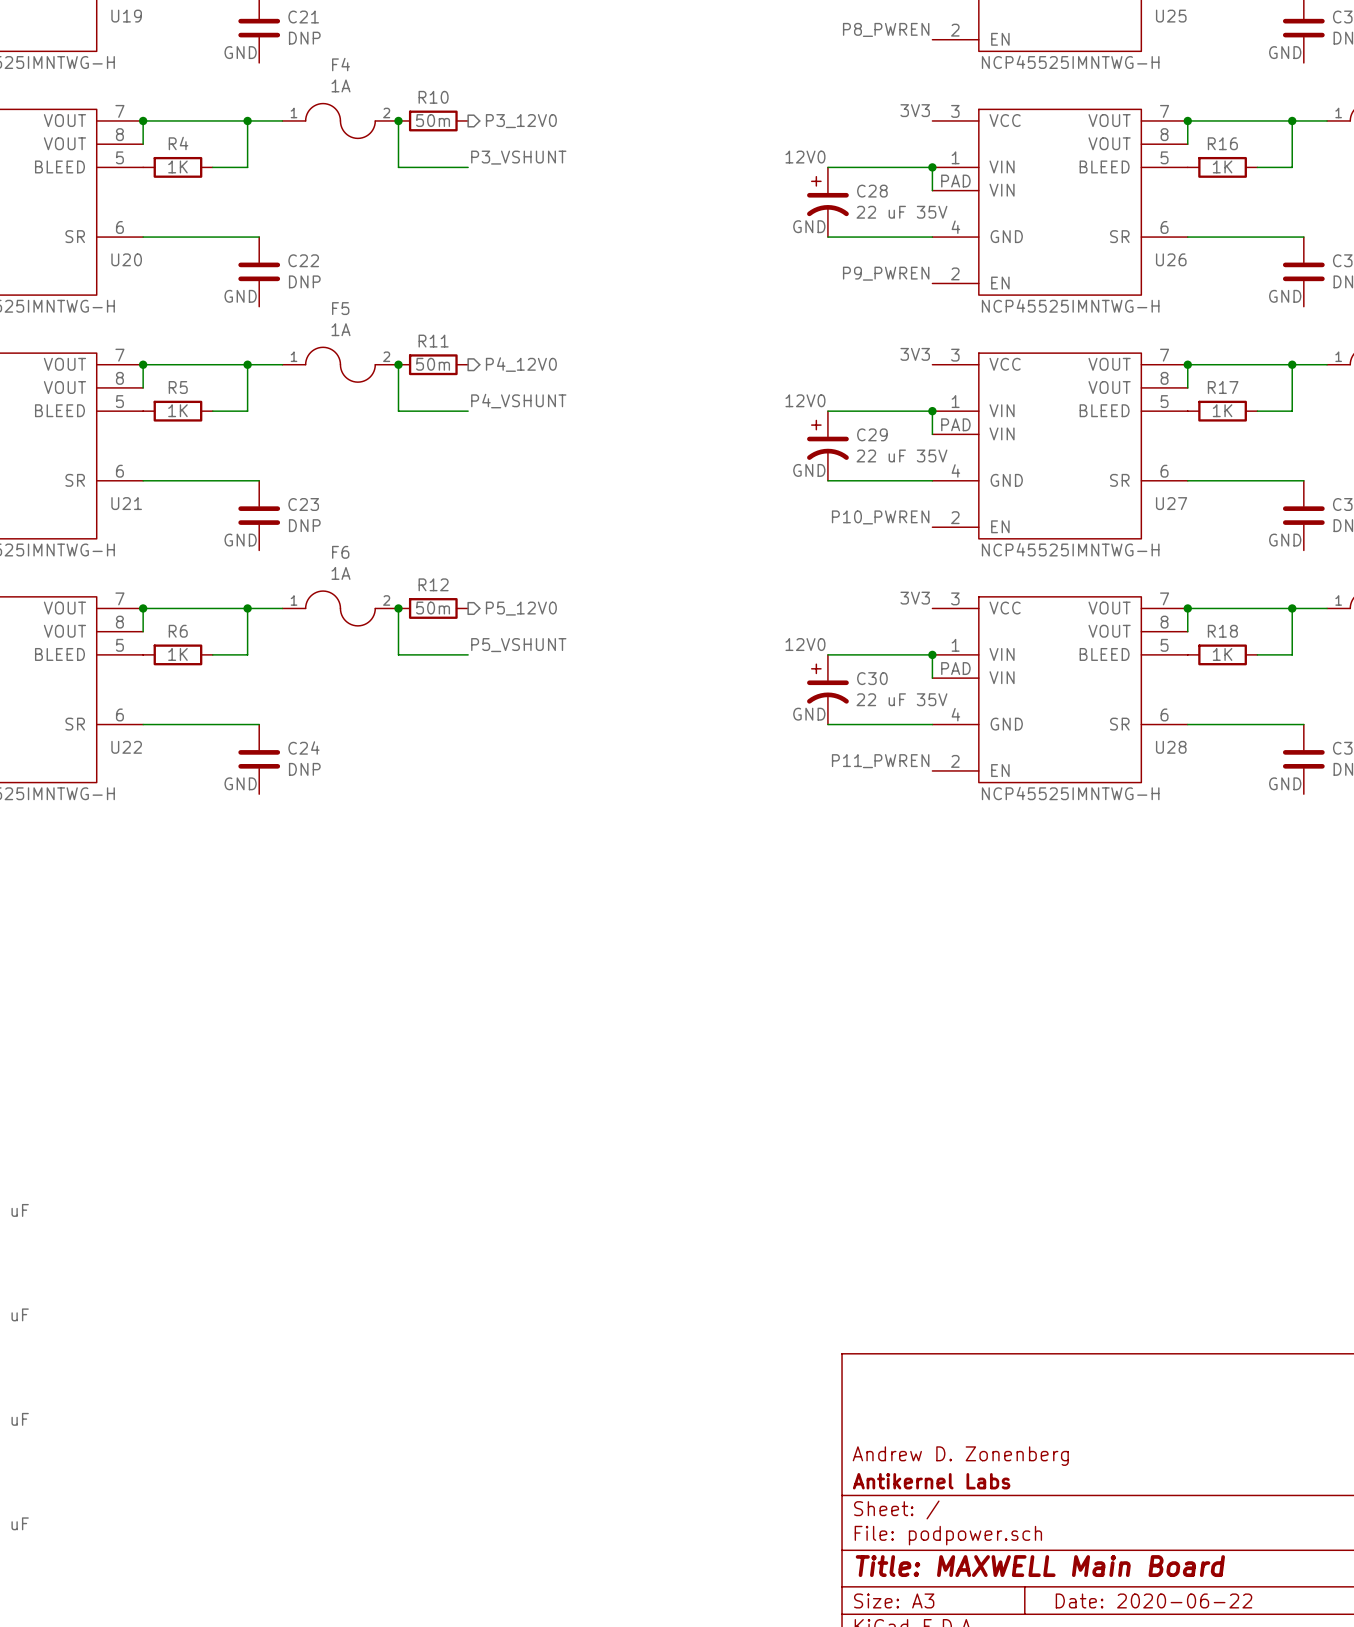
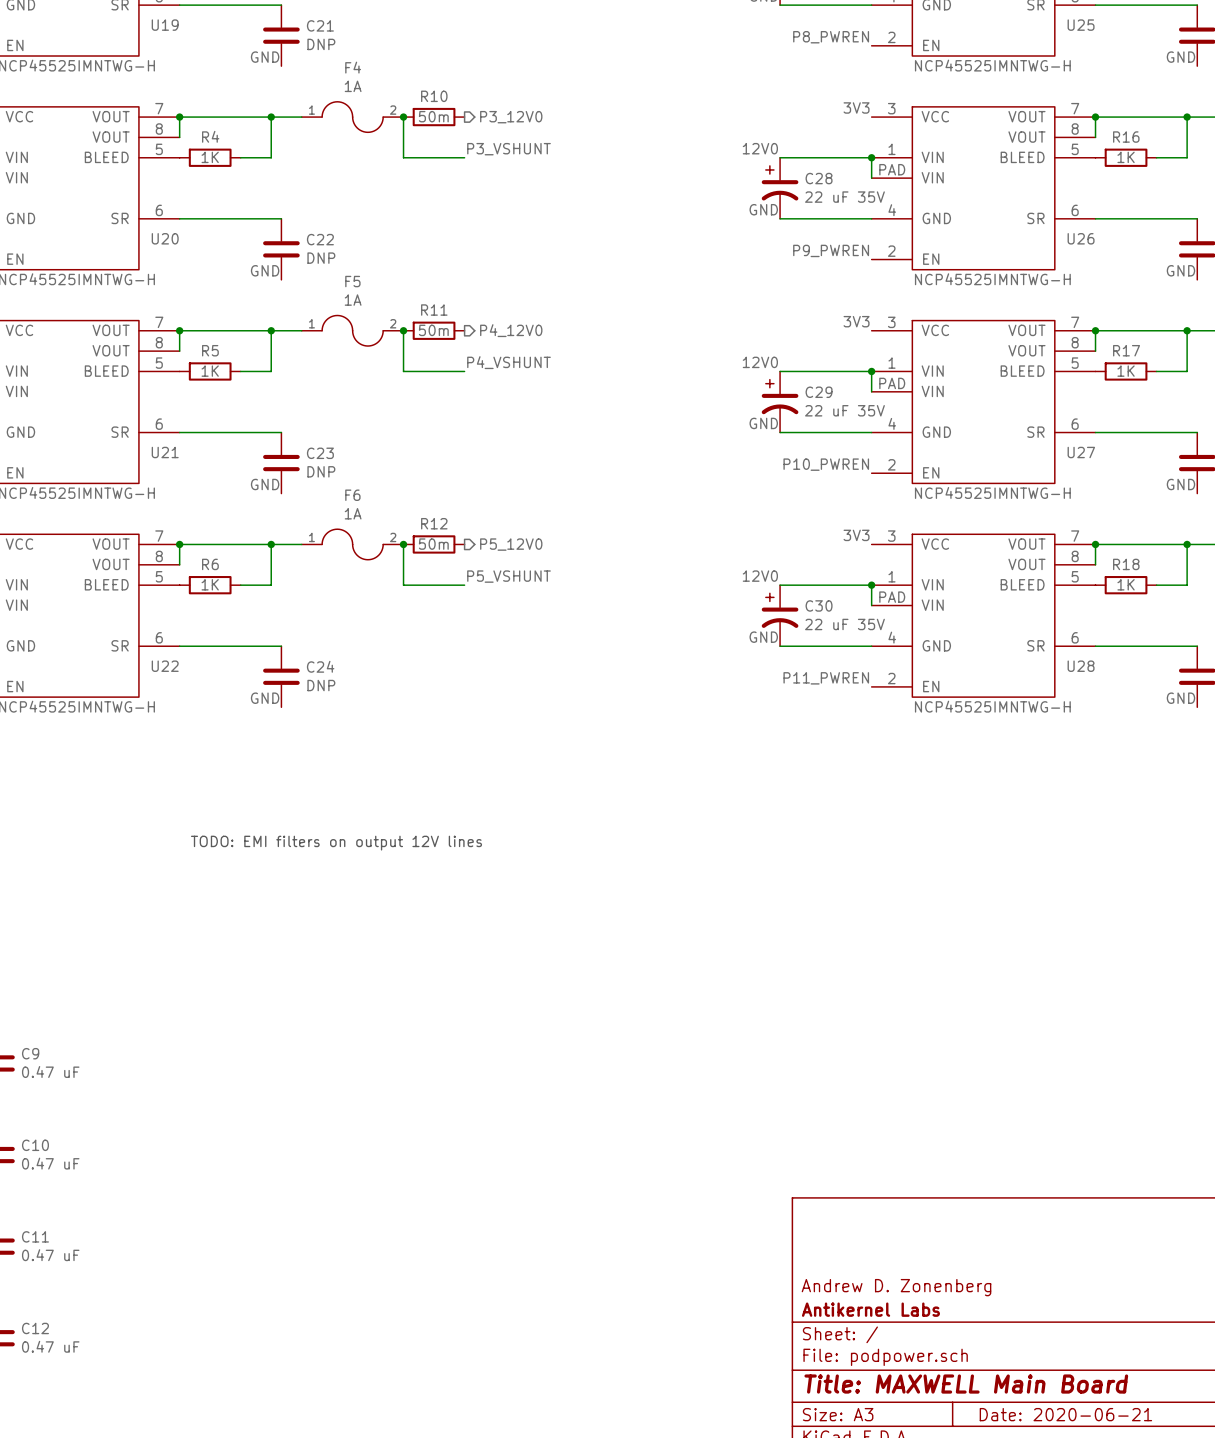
text: none -> TODO: EMI filters on output 12V lines (336, 843)
title block: Date: 2020-06-22 (1153, 1600) -> Date: 2020-06-21 (1065, 1414)

